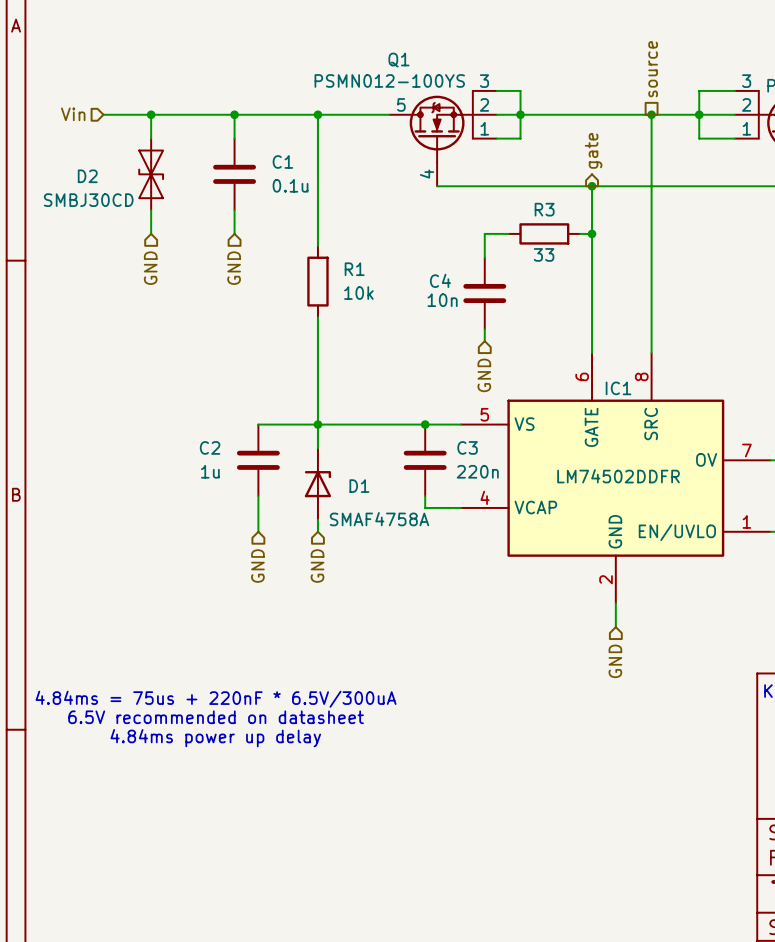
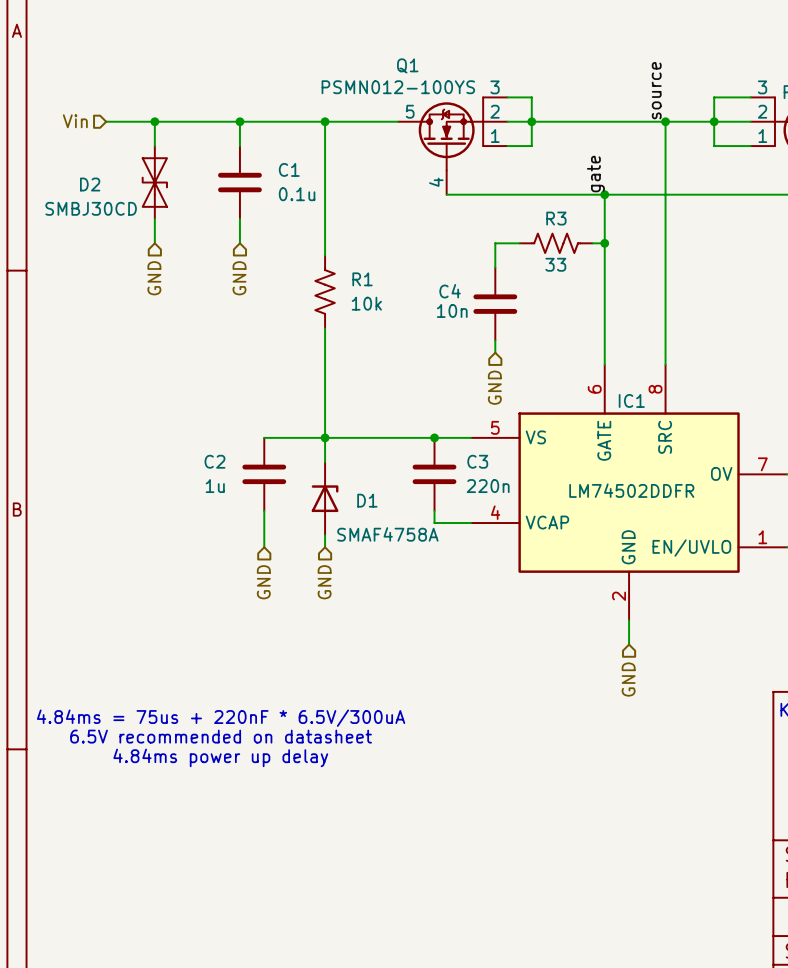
hierarchical label: source (653, 69) -> none
label: none -> source (656, 90)
hierarchical label: gate (593, 150) -> none
label: none -> gate (595, 174)
R3 symbol: [508, 223, 581, 245] -> [519, 233, 593, 254]
R1 symbol: [307, 245, 329, 318] -> [315, 255, 335, 329]

